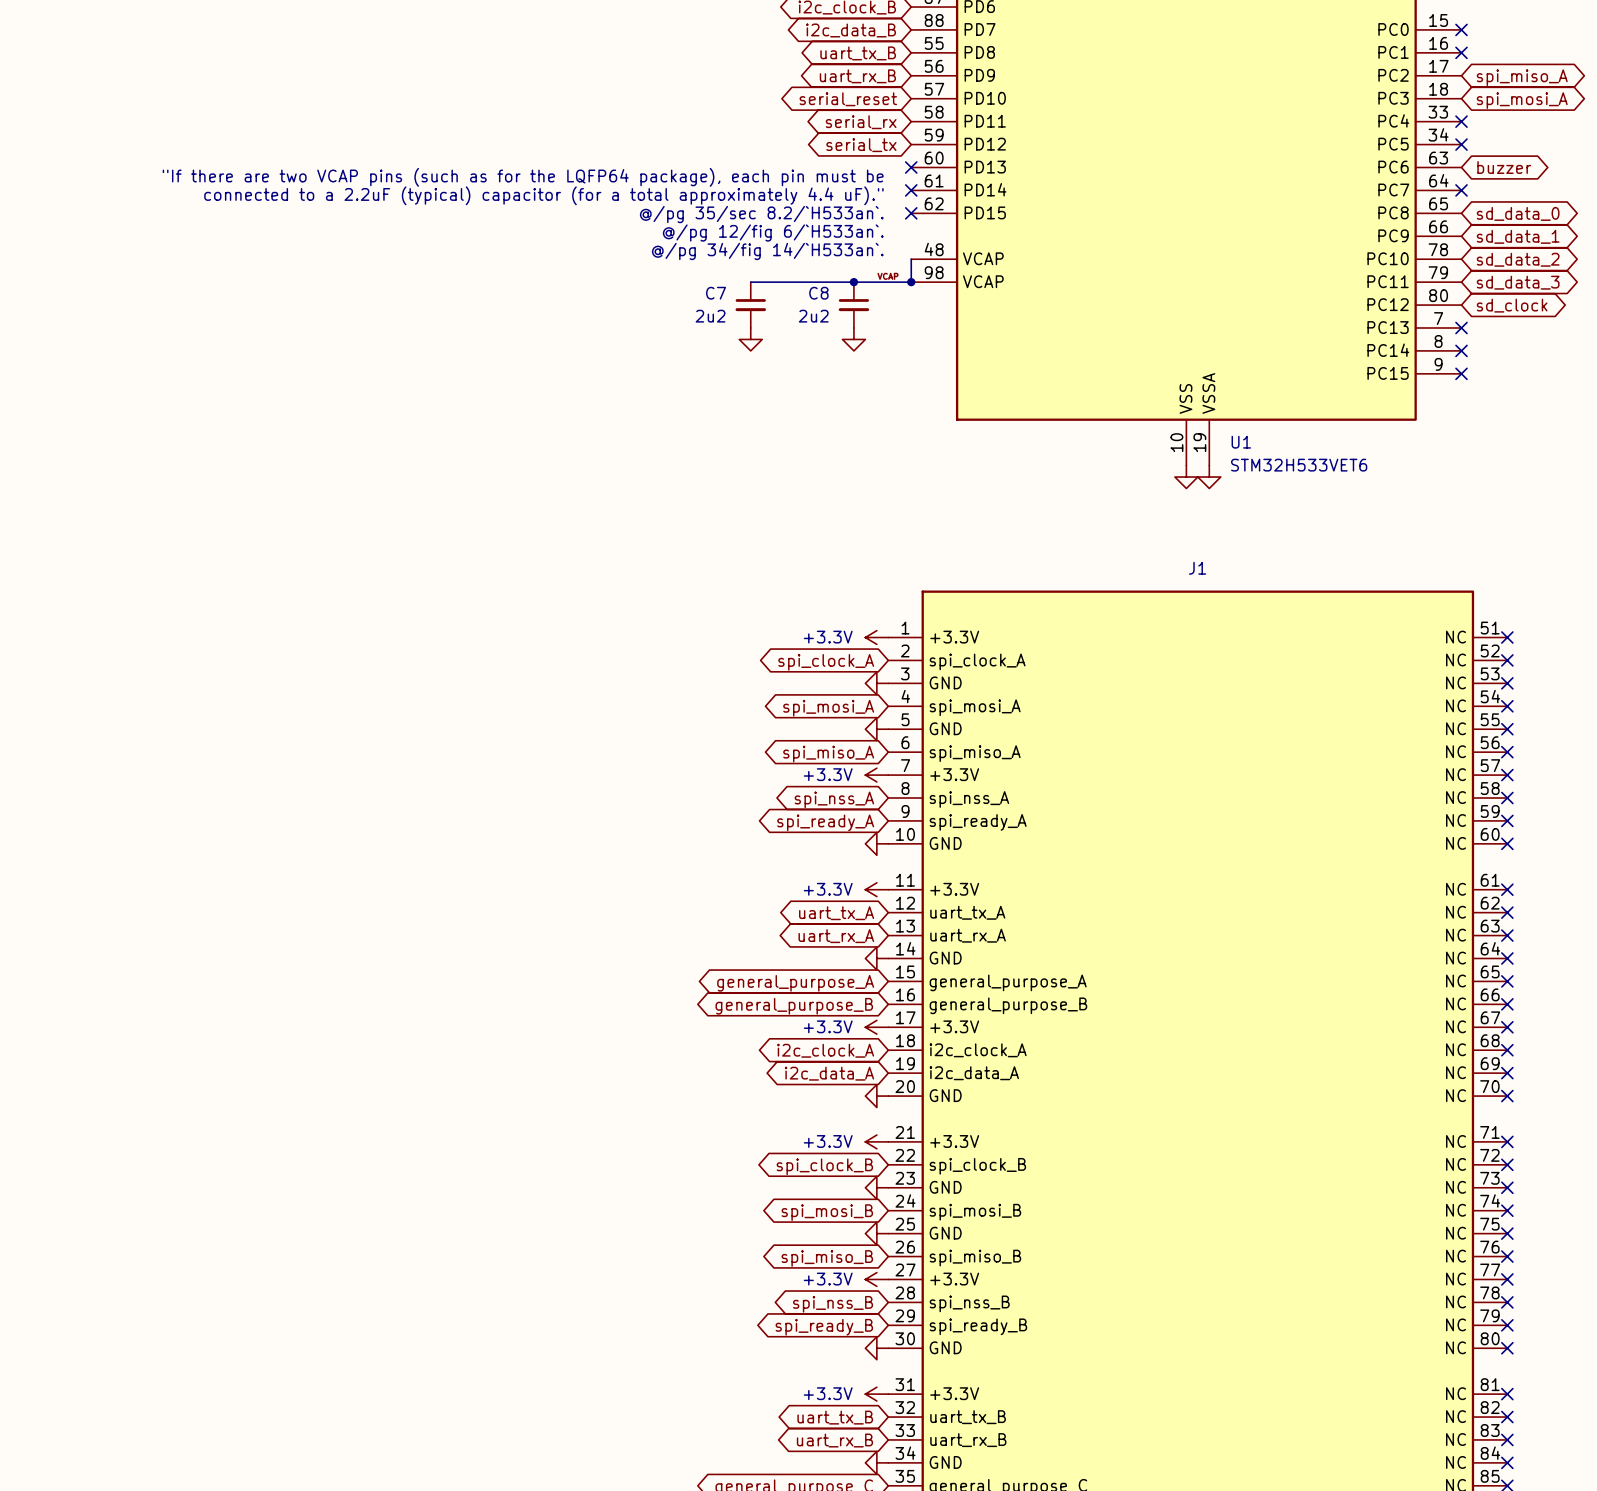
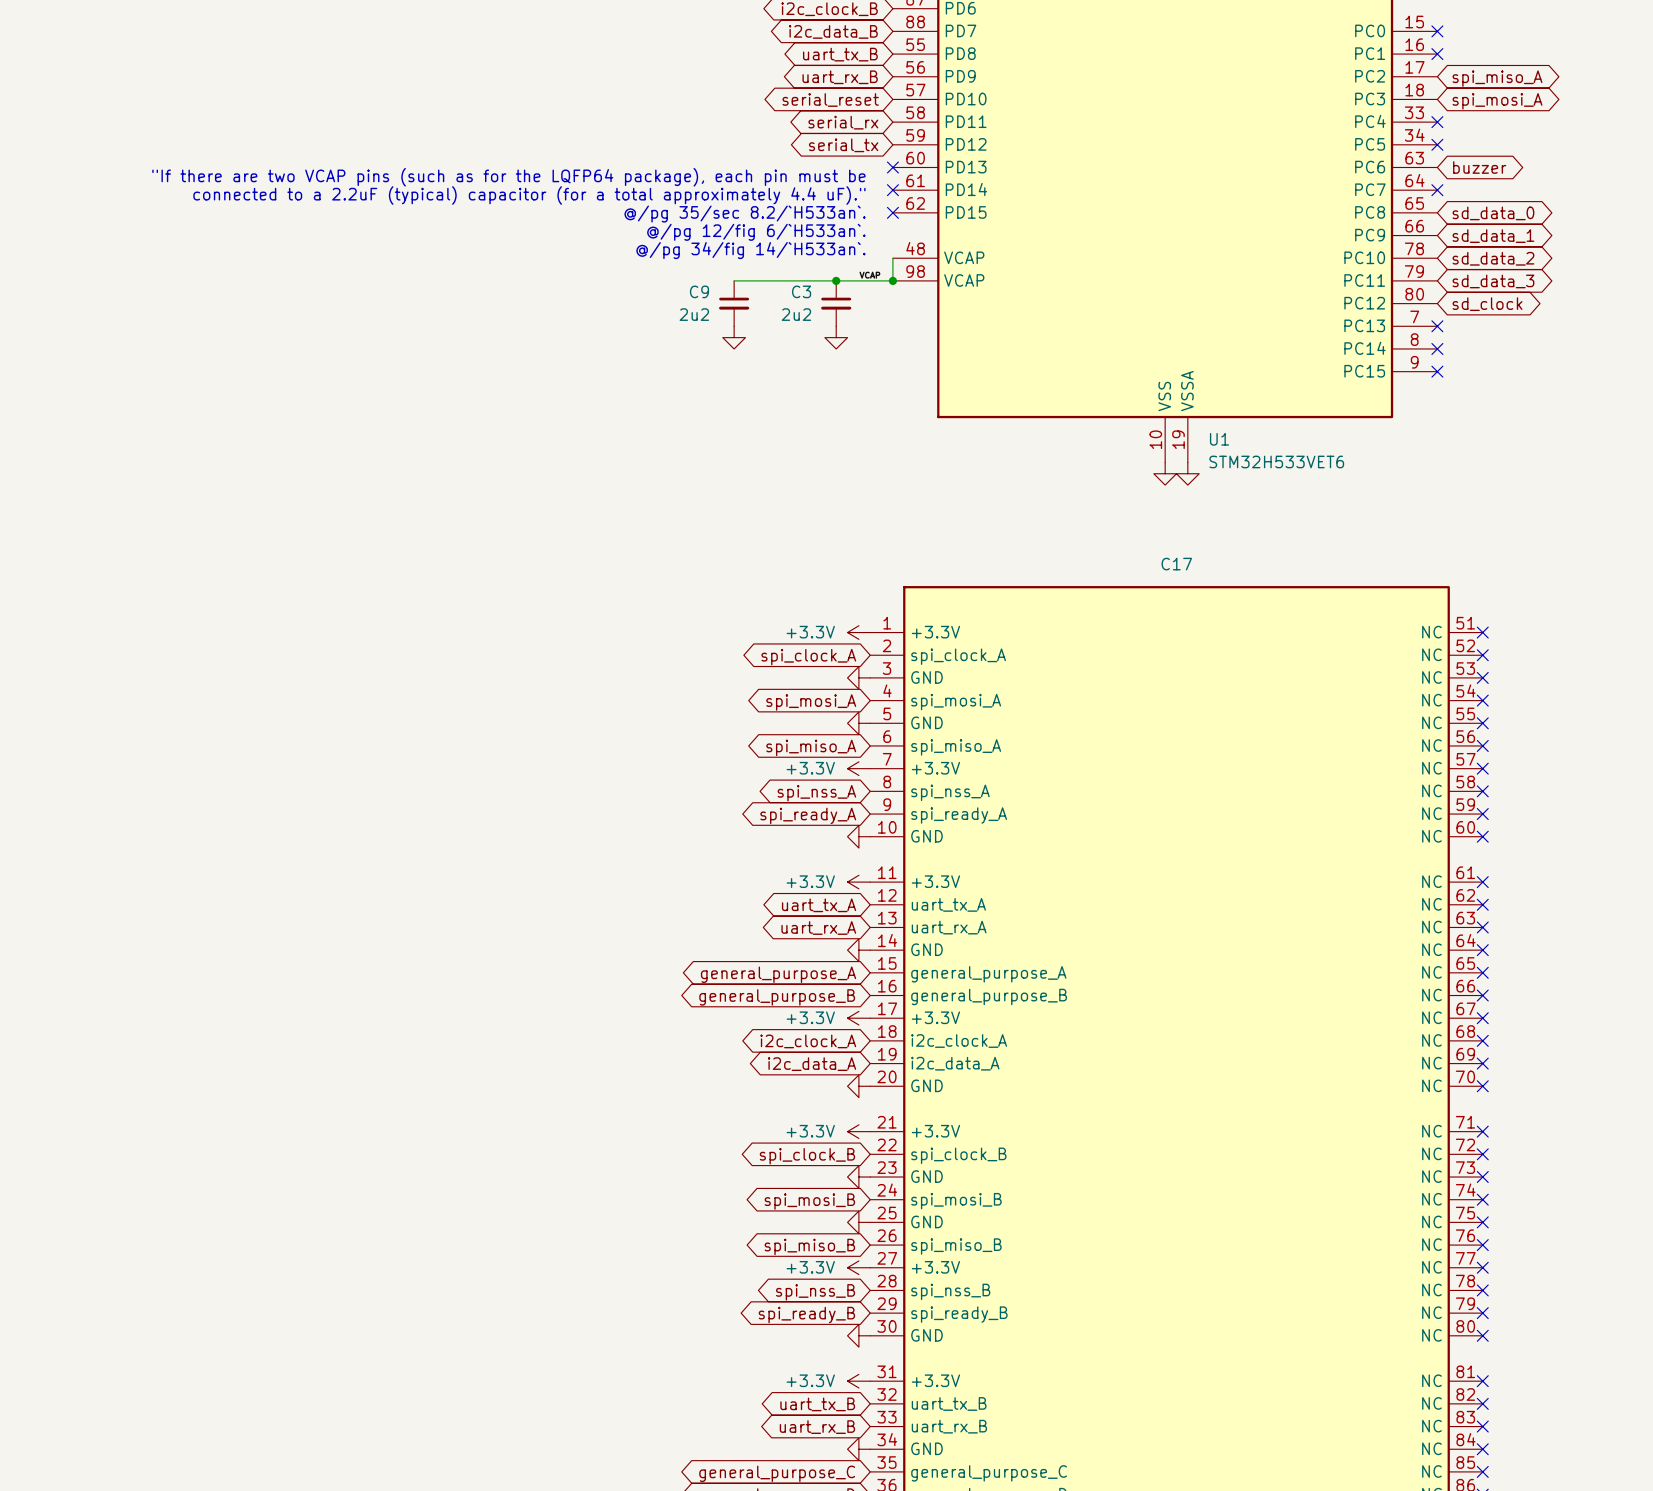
C7 name: C7 (716, 293) -> C9 (699, 291)
C8 name: C8 (818, 293) -> C3 (801, 291)
J1 name: J1 (1197, 568) -> C17 (1176, 564)

